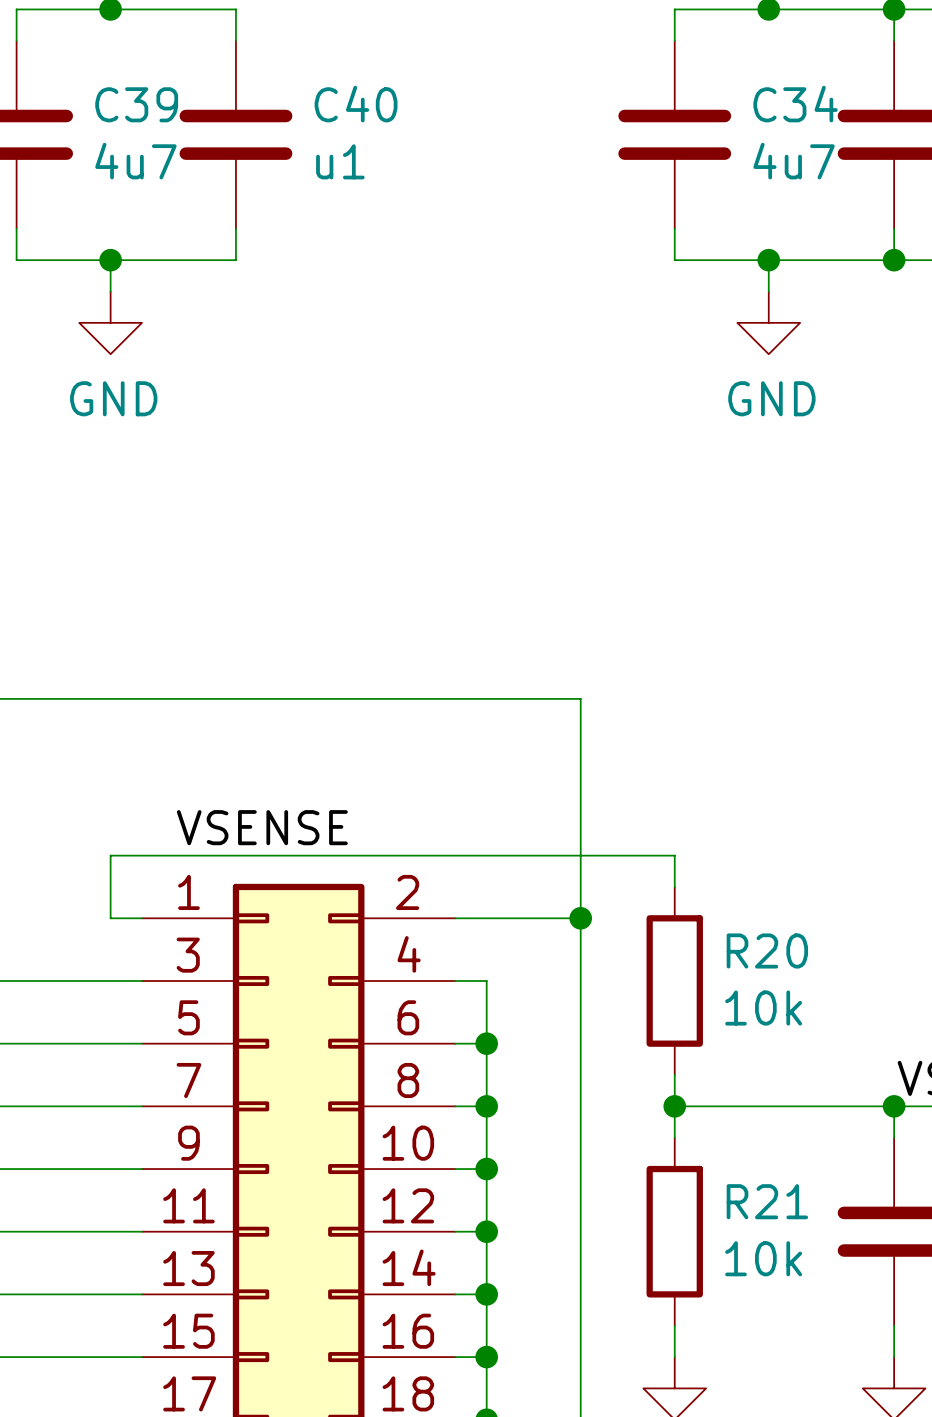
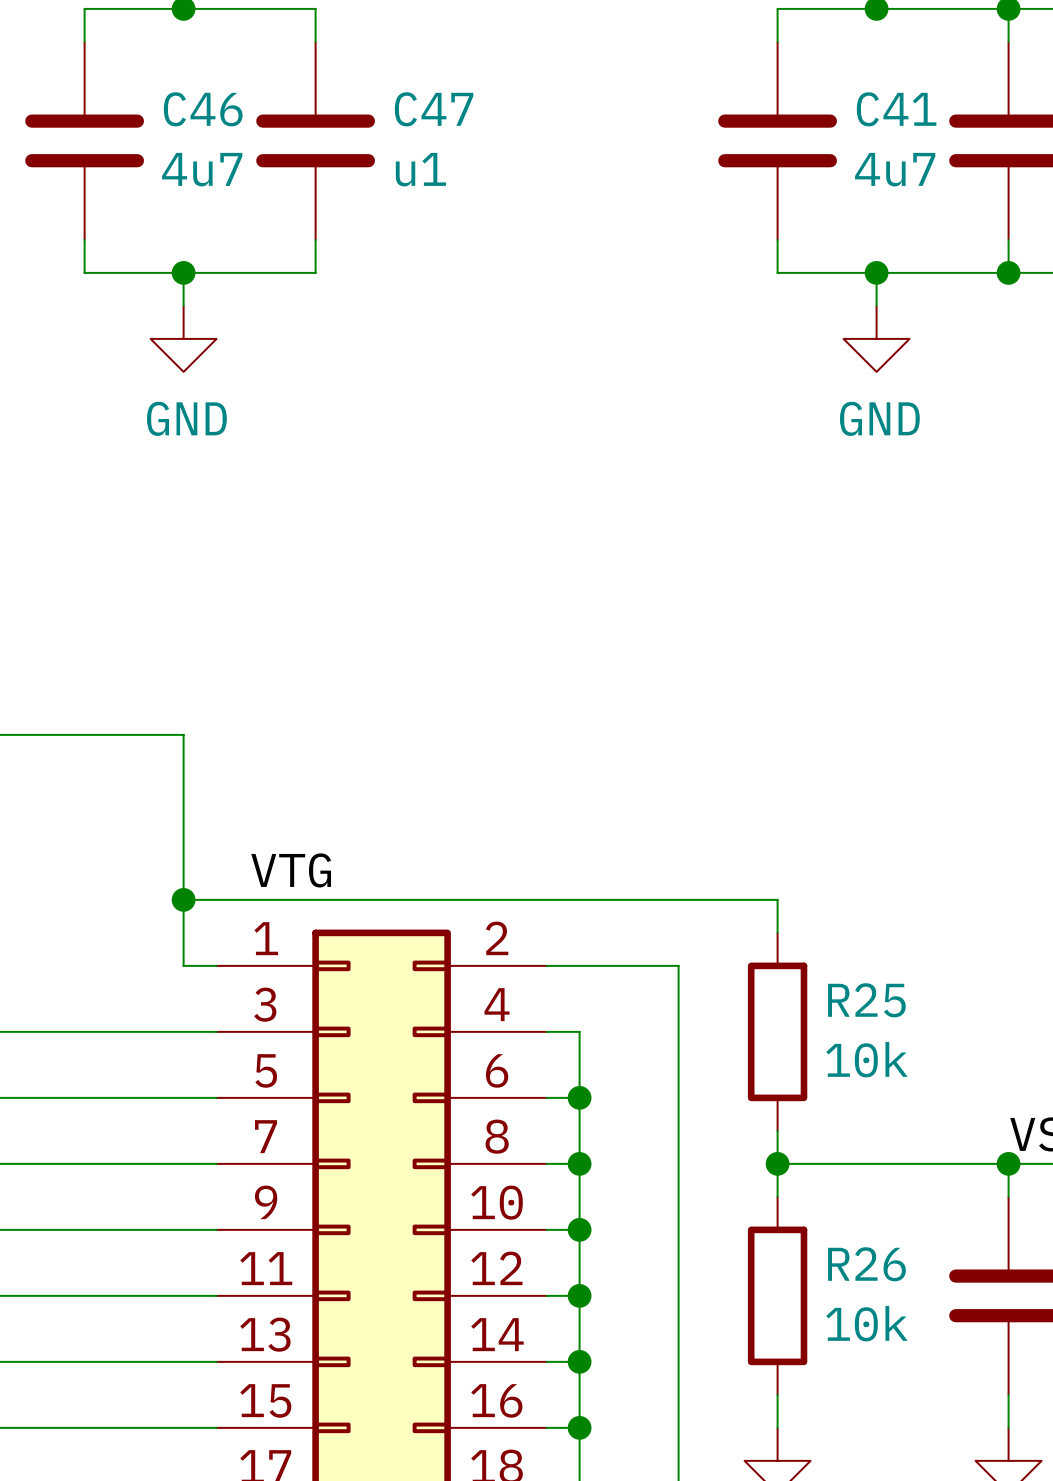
C39 name: C39 (136, 104) -> C46 (203, 109)
C40 name: C40 (356, 104) -> C47 (434, 109)
C34 name: C34 (795, 104) -> C41 (896, 109)
wire: (110, 698) (580, 698) (580, 918) -> (183, 734) (183, 899)
label: VSENSE (262, 827) -> VTG (291, 870)
junction: none -> (183, 899)
junction: (580, 918) -> none
R20 name: R20 (767, 950) -> R25 (866, 1000)
R21 name: R21 (767, 1201) -> R26 (866, 1264)

